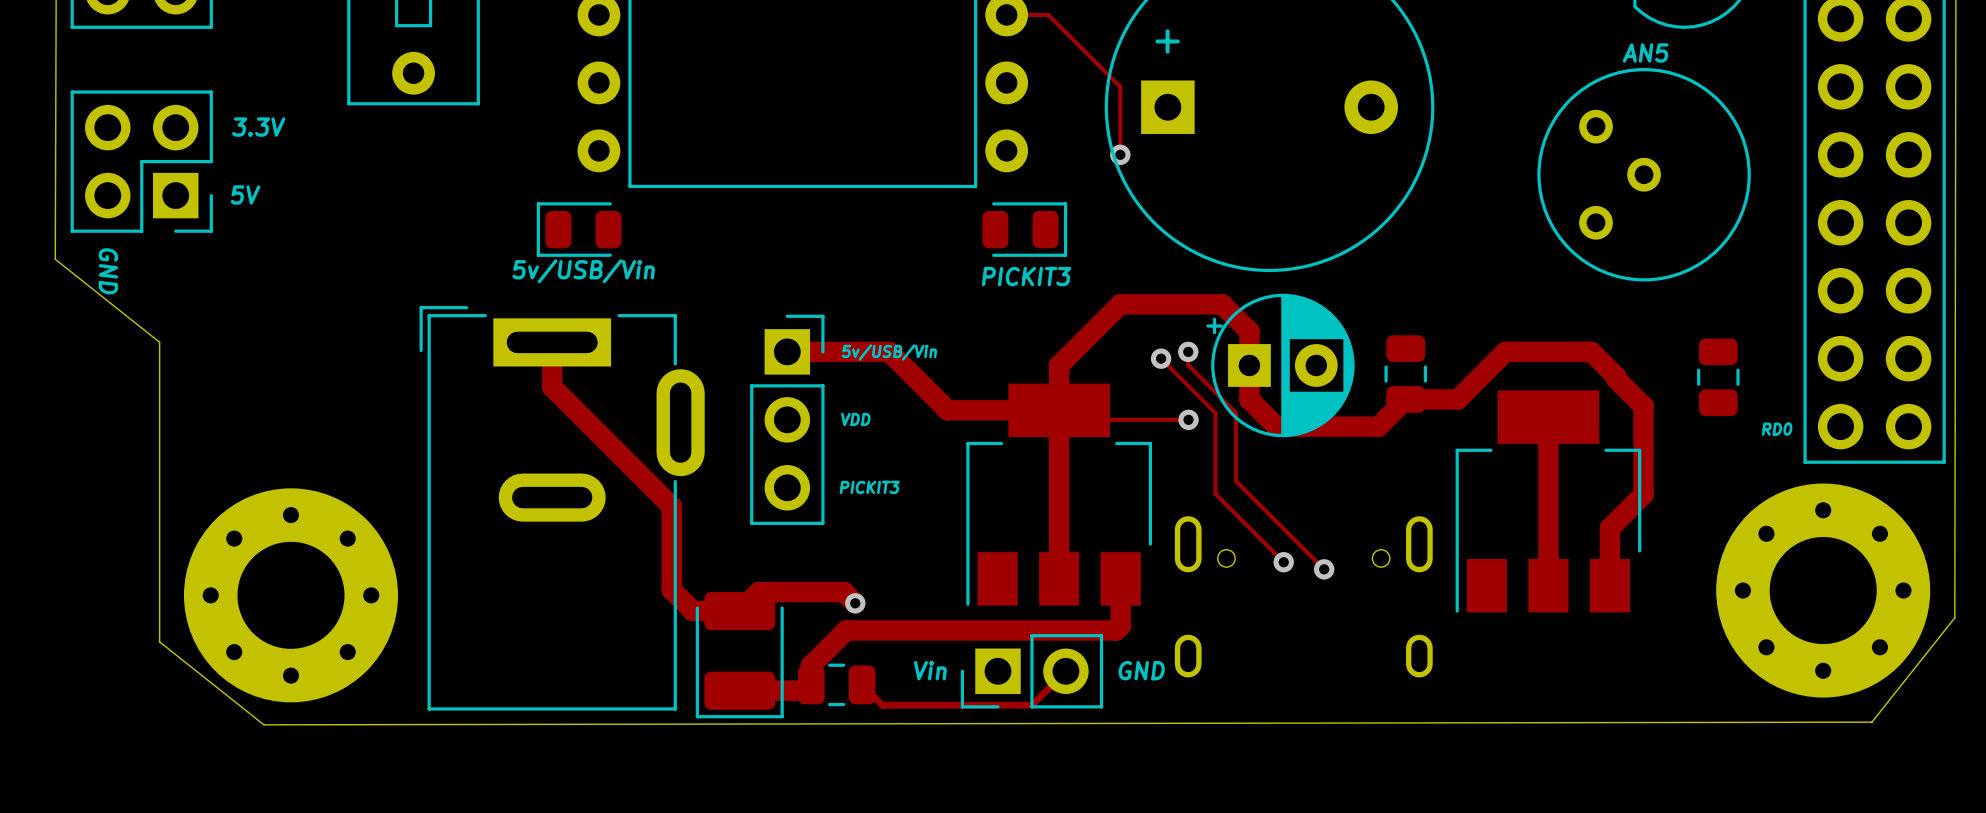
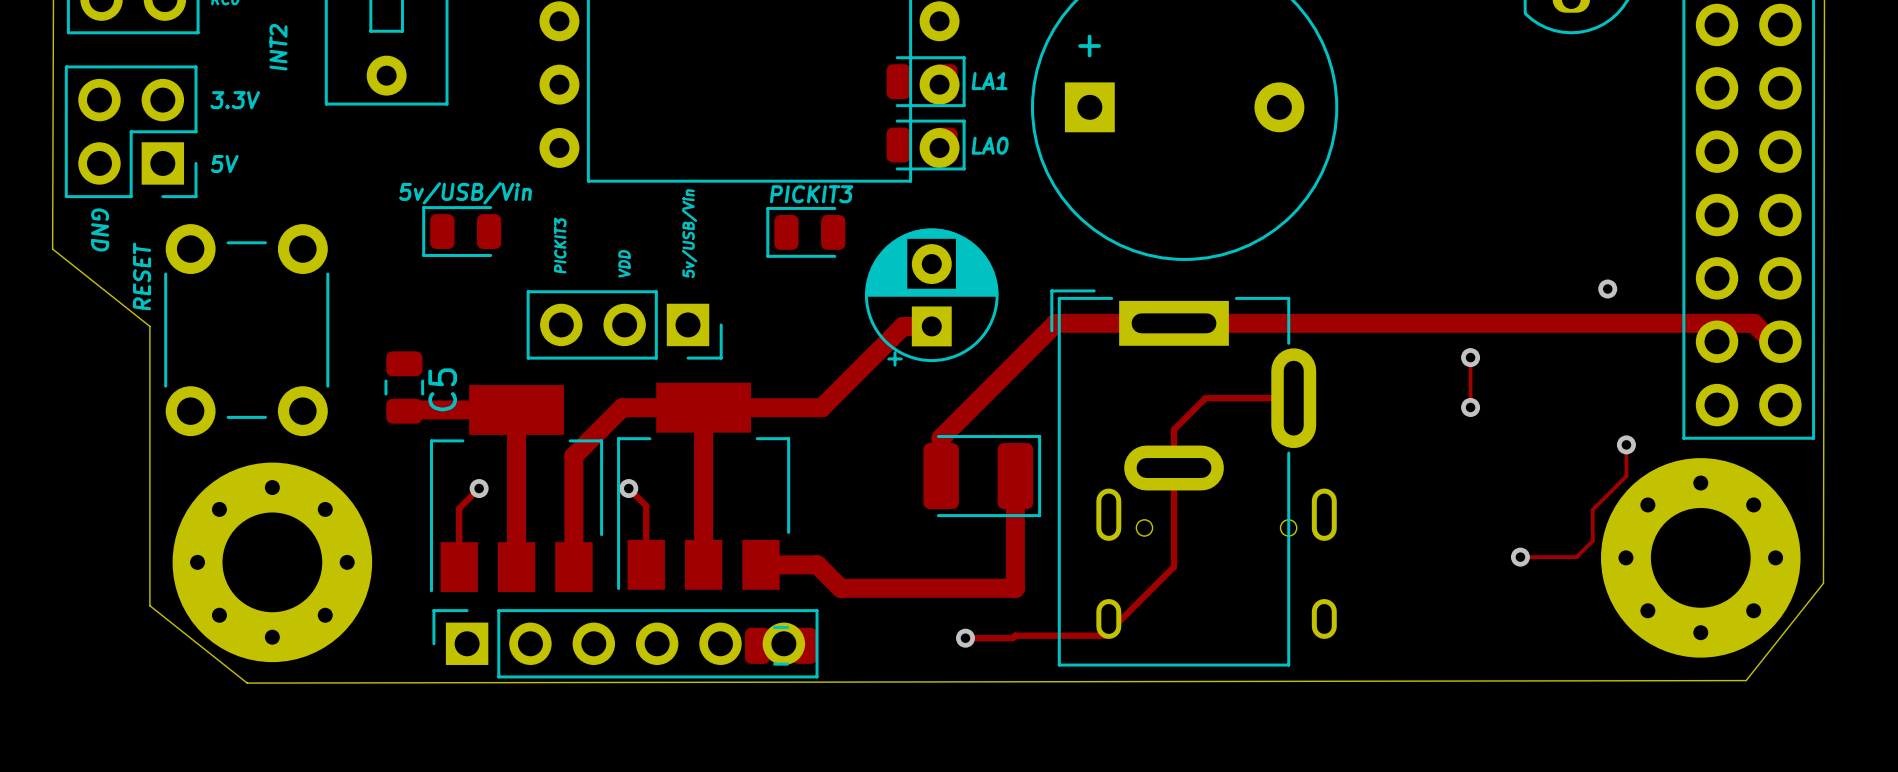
track: (1006, 14) (1048, 14) (1120, 86) (1120, 154) -> none
text: none -> INT2 (278, 47)
text: AN5 (1645, 52) -> none
part: none -> (926, 81)
text: none -> LA1 (989, 81)
text position: 3.3V (258, 127) -> 3.3V (235, 100)
part: none -> (926, 145)
text: none -> LA0 (990, 145)
via: (1120, 154) -> none
part position: (141, 161) -> (131, 131)
part: (1644, 174) -> none
text position: 5V (245, 194) -> 5V (224, 164)
text: none -> 5v/USB/Vin (465, 193)
text: none -> PICKIT3 (811, 194)
part position: (579, 229) -> (461, 231)
part: (1024, 229) -> none
part: none -> (805, 232)
text: none -> 5v/USB/Vin (689, 233)
text position: GND (108, 271) -> GND (100, 229)
text: 5v/USB/Vin (583, 271) -> PICKIT3 (560, 245)
text: PICKIT3 (1026, 276) -> none
text: none -> RESET (142, 276)
via: none -> (1607, 289)
part footprint: [419, 306, 705, 711] -> [429, 385, 604, 593]
track: (552, 342) (552, 386) (671, 506) (671, 589) (693, 611) (739, 611) (758, 592) (844, 592) (855, 603) -> none
track: none -> (931, 326) (903, 326) (821, 407) (622, 407) (573, 456) (573, 567)
part: none -> (246, 330)
track: (787, 351) (889, 351) (947, 410) (1031, 410) -> none
track: (1188, 351) (1188, 365) (1235, 412) (1235, 481) (1324, 569) -> none
via: (1188, 351) -> none
text: 5v/USB/Vin (889, 352) -> none
track: (1161, 358) (1215, 413) (1215, 493) (1283, 562) -> none
via: (1161, 358) -> none
track: none -> (1776, 345) (1753, 323) (1055, 323) (941, 438) (941, 476)
part rotation: 0° (1280, 365) -> 90° counterclockwise (931, 297)
part position: (1280, 365) -> (931, 297)
part: (1405, 374) -> none
track: none -> (1470, 357) (1470, 407)
via: none -> (1470, 357)
part: (1718, 377) -> none
part footprint: [966, 383, 1152, 606] -> [923, 435, 1042, 518]
C5: none -> (404, 387)
track: (1548, 417) (1548, 585) -> none
track: (1078, 418) (1079, 419) (1188, 419) -> none
part rotation: 0° (787, 419) -> 90° clockwise (624, 324)
part position: (787, 419) -> (624, 324)
text rotation: 0° (855, 419) -> 90° counterclockwise (624, 263)
text position: VDD (855, 419) -> VDD (624, 263)
via: (1188, 419) -> none
track: none -> (1293, 398) (1205, 398) (1174, 429) (1174, 566) (1105, 635) (1015, 635) (1012, 638) (965, 638)
track: none -> (703, 407) (703, 564)
via: none -> (1470, 407)
text: RD0 (1777, 429) -> none
track: none -> (404, 411) (516, 409) (516, 567)
track: none -> (1626, 444) (1626, 476) (1592, 509) (1592, 540) (1576, 557) (1520, 557)
via: none -> (1626, 444)
text: PICKIT3 (869, 487) -> none
part: (1548, 501) -> none
track: none -> (1015, 476) (1015, 588) (840, 588) (817, 564) (760, 564)
part: none -> (1183, 477)
part: none -> (703, 486)
track: none -> (479, 488) (459, 508) (459, 567)
via: none -> (479, 488)
track: none -> (628, 488) (646, 505) (646, 564)
via: none -> (628, 488)
via: (1283, 562) -> none
via: (1324, 569) -> none
track: (1059, 578) (1059, 365) (1120, 304) (1222, 304) (1249, 331) (1249, 399) (1276, 426) (1378, 426) (1405, 399) (1457, 399) (1505, 351) (1591, 351) (1643, 406) (1643, 494) (1609, 528) (1609, 585) -> none
track: (1120, 578) (1120, 626) (1116, 630) (846, 630) (811, 665) (811, 684) (805, 690) (739, 690) -> none
via: none -> (1520, 557)
via: (855, 603) -> none
part: (739, 655) -> none
text: Vin (930, 670) -> none
text: GND (1141, 670) -> none
part: (1031, 671) -> none
track: (1065, 671) (1031, 705) (882, 705) (862, 684) -> none
via: none -> (965, 638)
part: none -> (625, 643)

